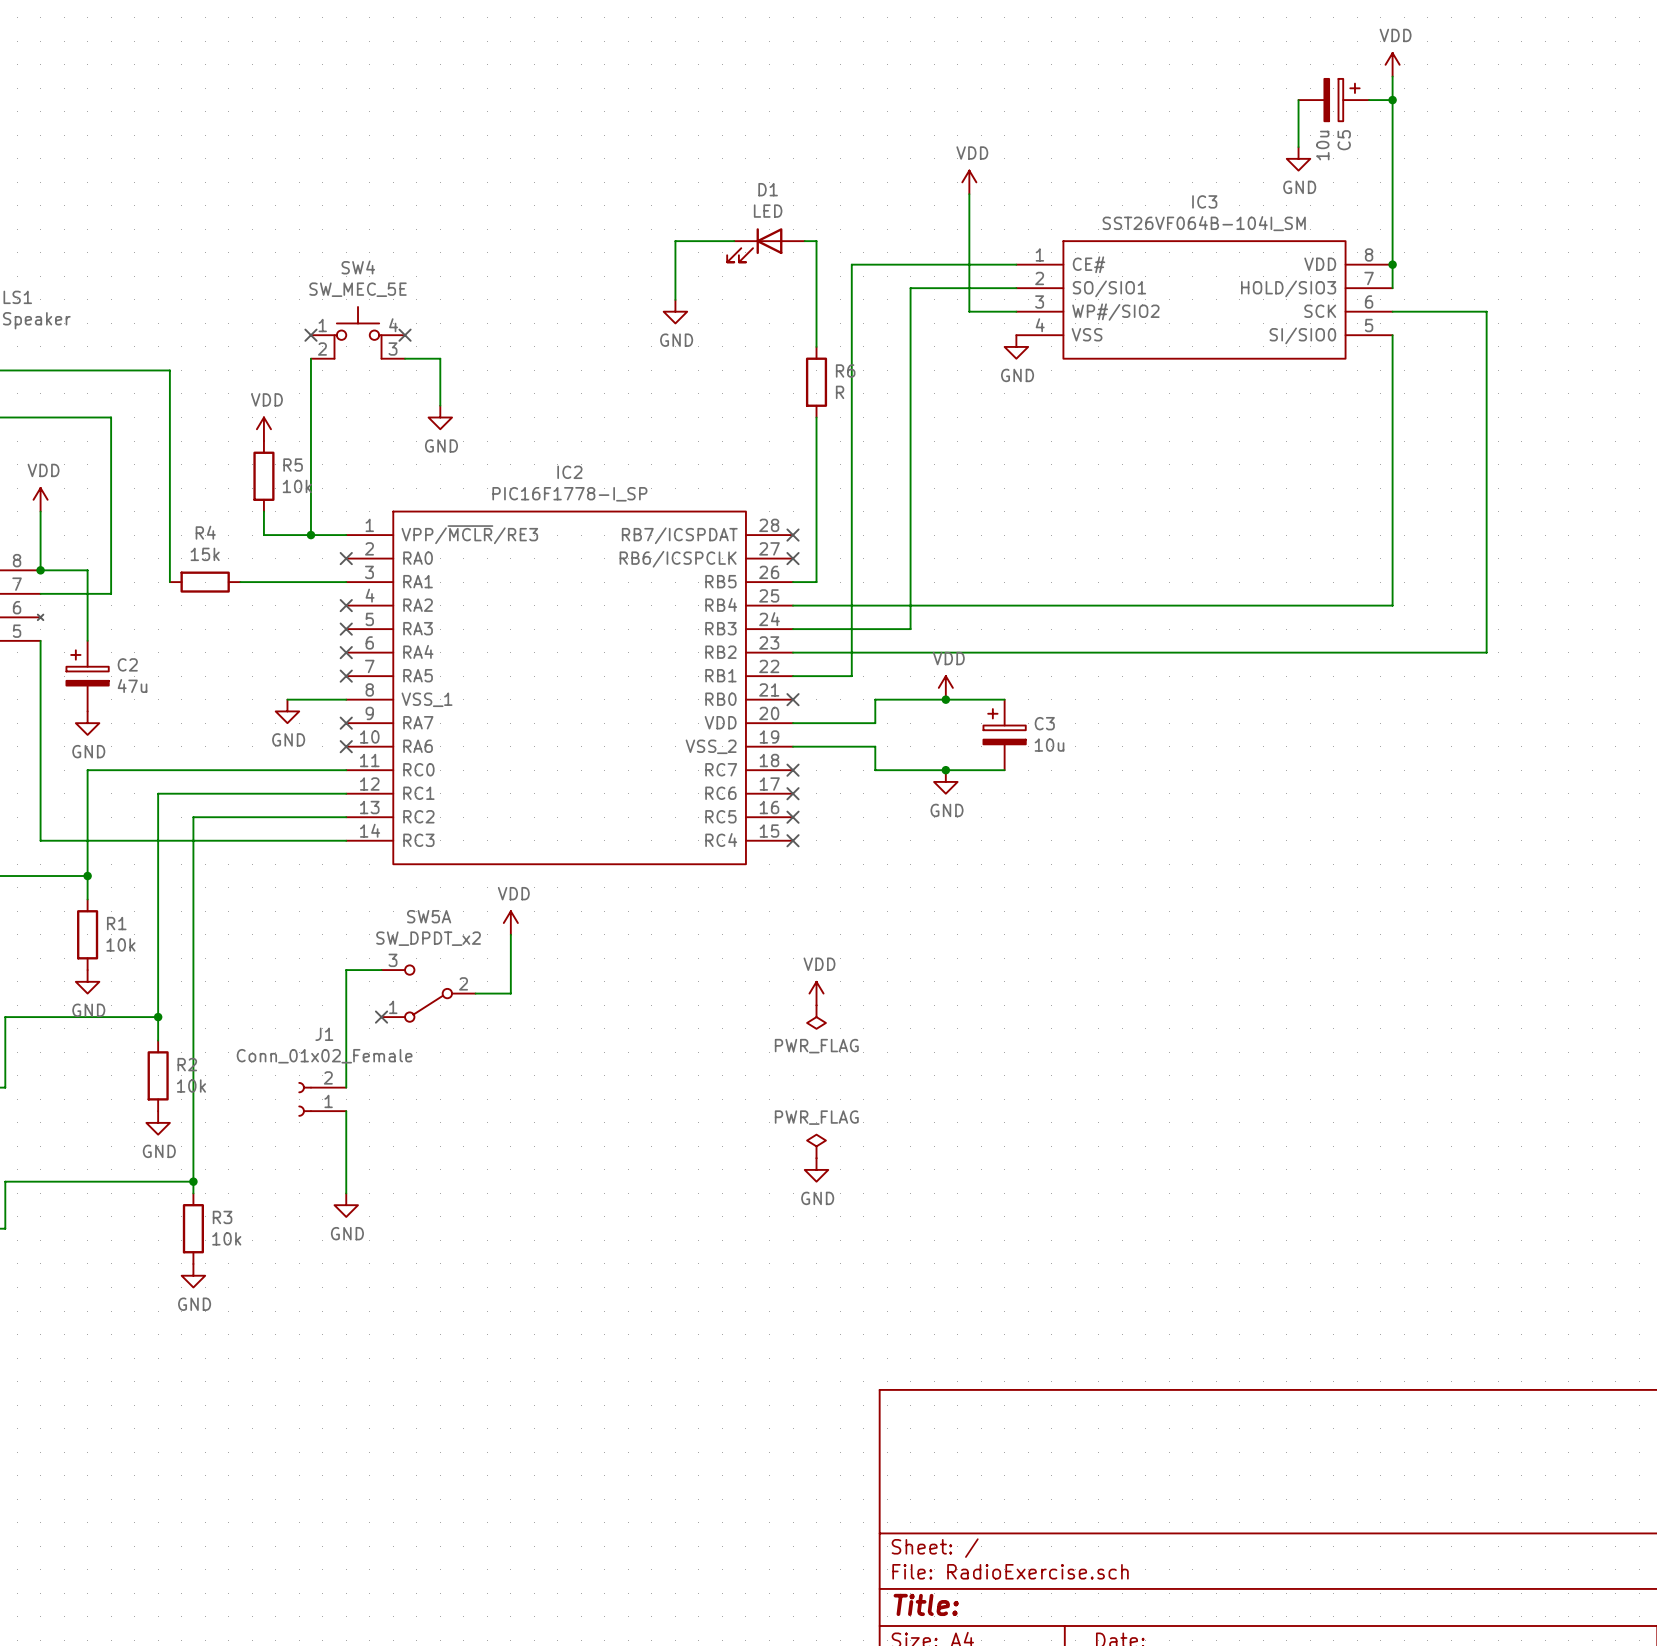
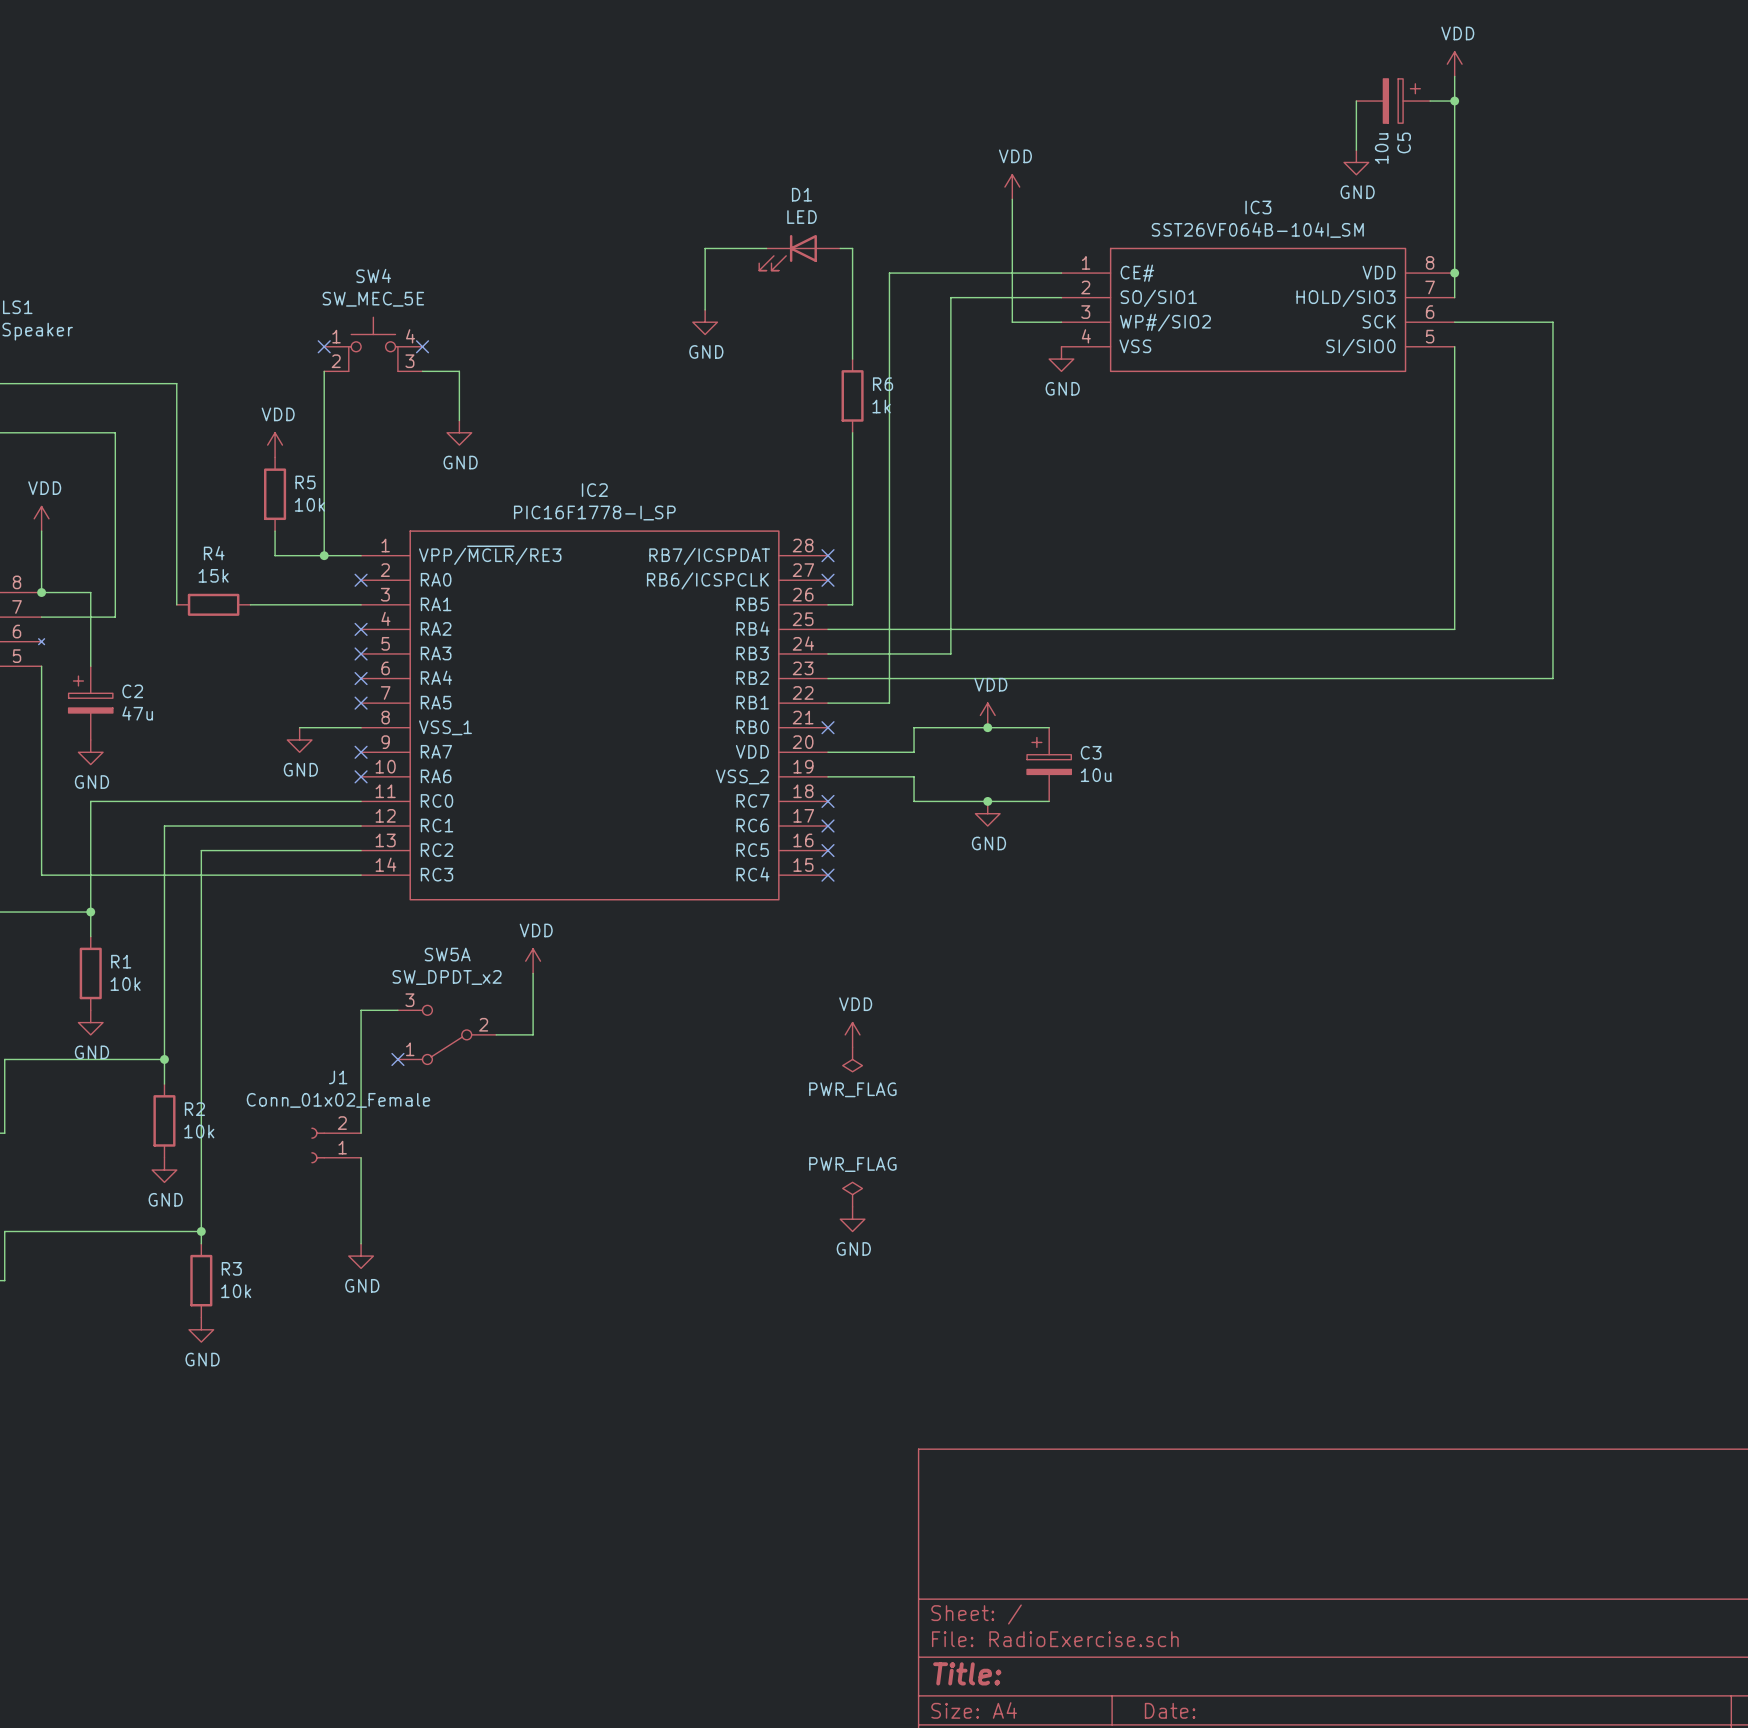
R6 value: R (840, 392) -> 1k (881, 406)

